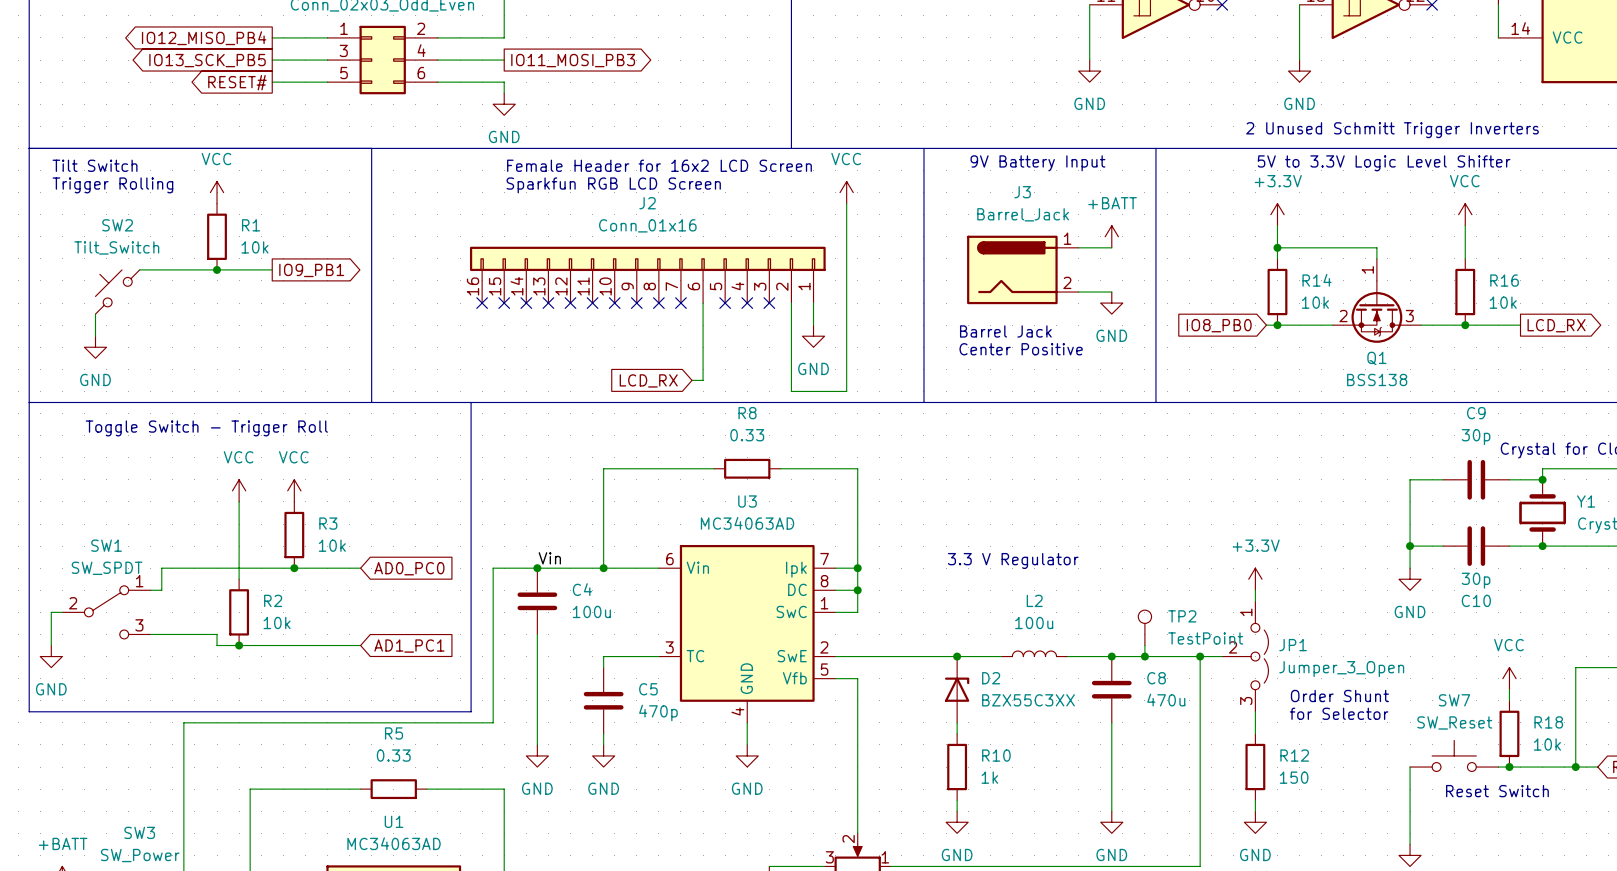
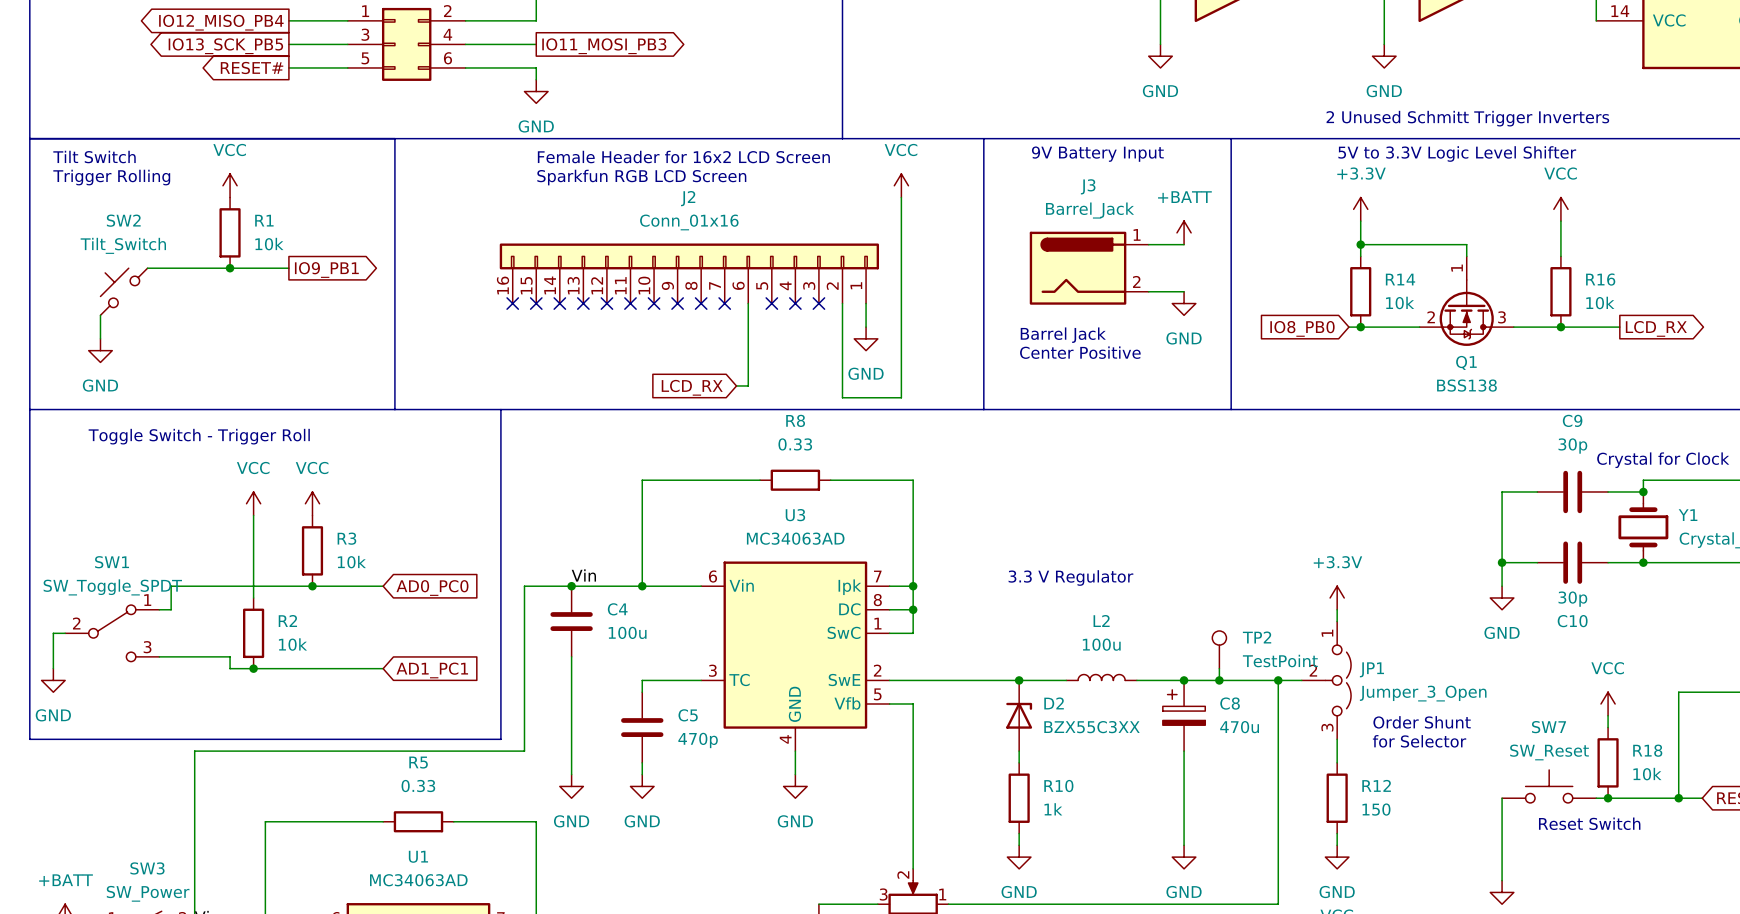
SW1 value: SW_SPDT (107, 568) -> SW_Toggle_SPDT (112, 587)
C8 symbol: [1091, 656, 1132, 723] -> [1162, 680, 1206, 752]

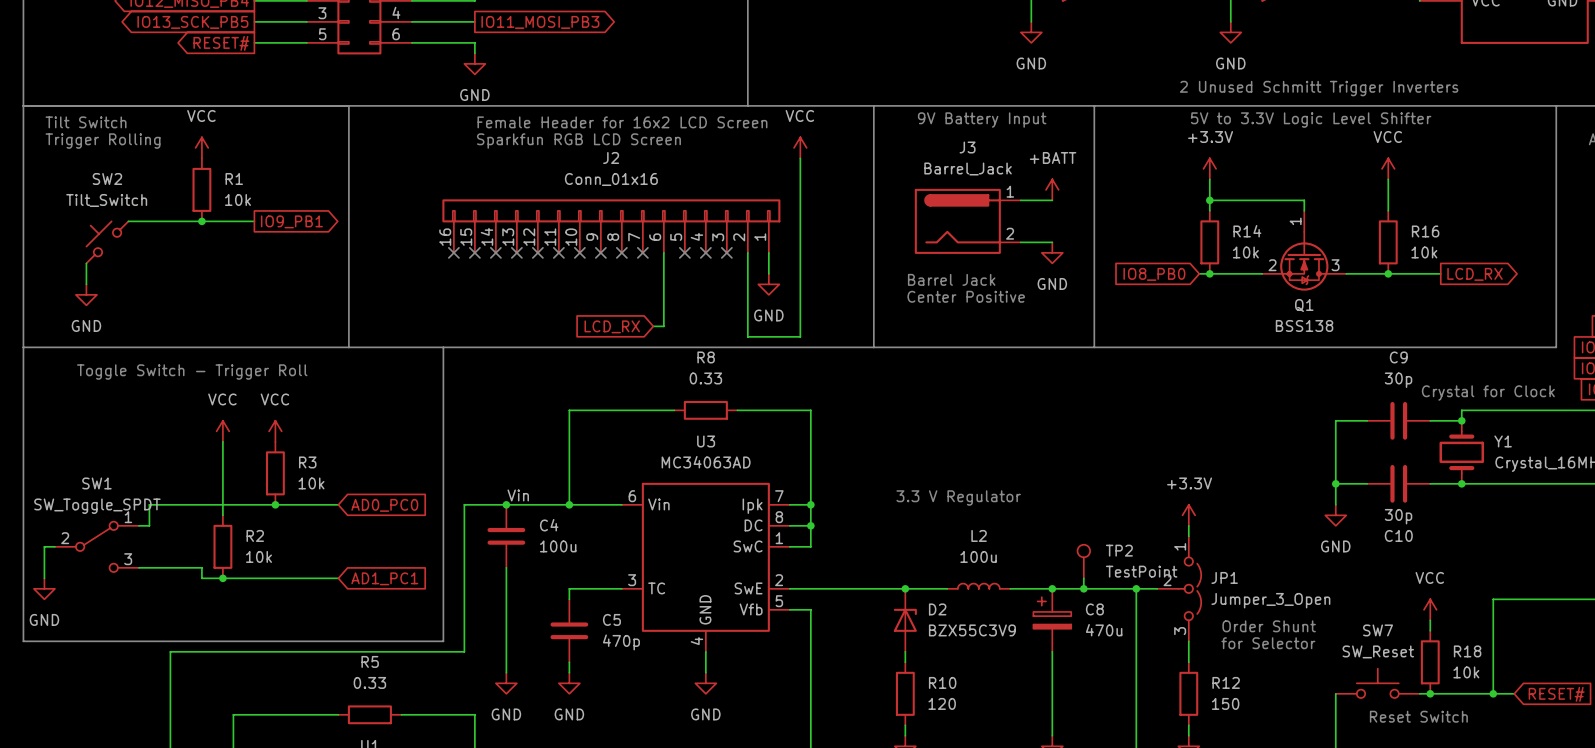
D2 value: BZX55C3XX (1091, 727) -> BZX55C3V9 (972, 630)
R10 value: 1k (1053, 809) -> 120 (942, 703)

